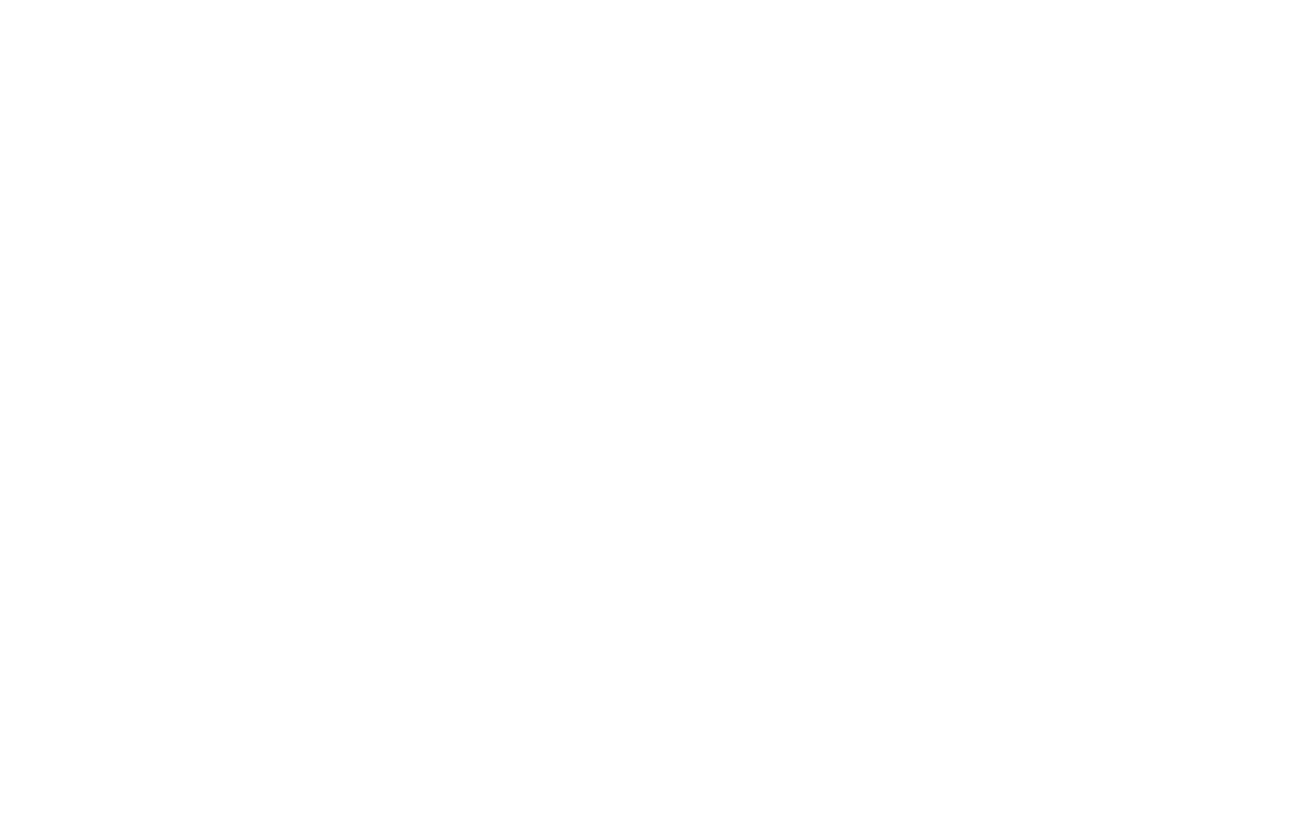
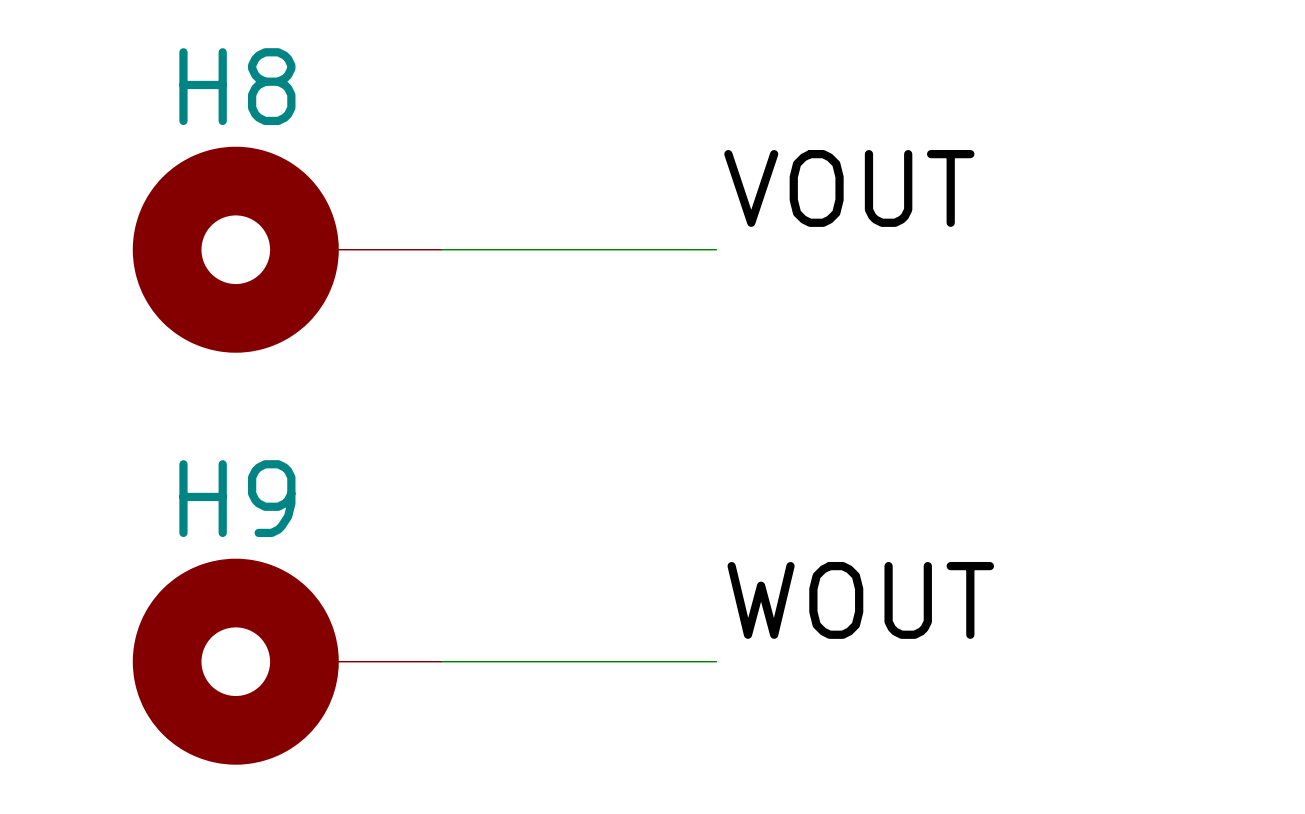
label: none -> VOUT (849, 188)
H8: none -> (287, 249)
wire: none -> (441, 249) (716, 249)
label: none -> WOUT (860, 600)
H9: none -> (287, 661)
wire: none -> (441, 661) (716, 661)

